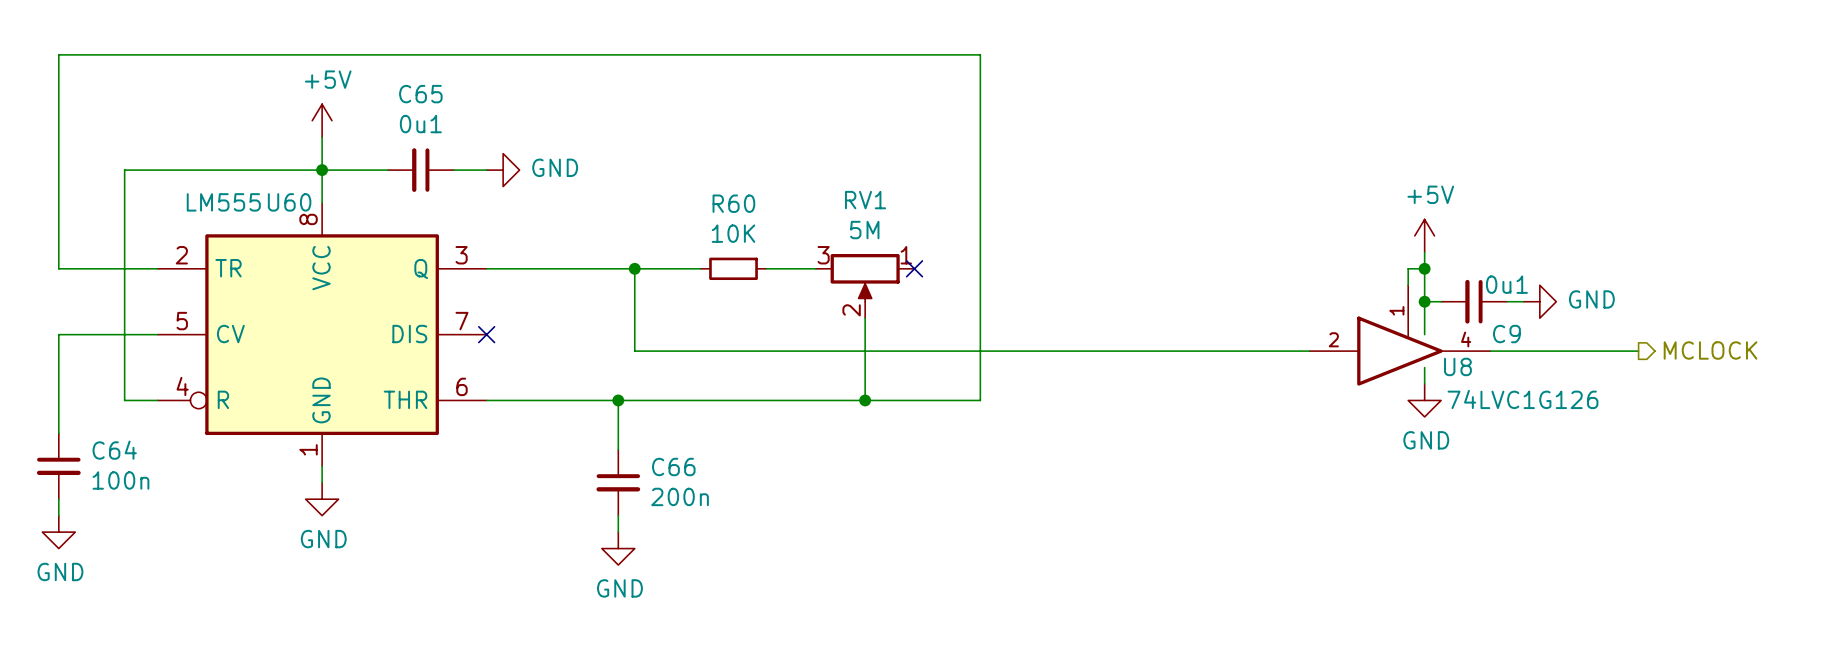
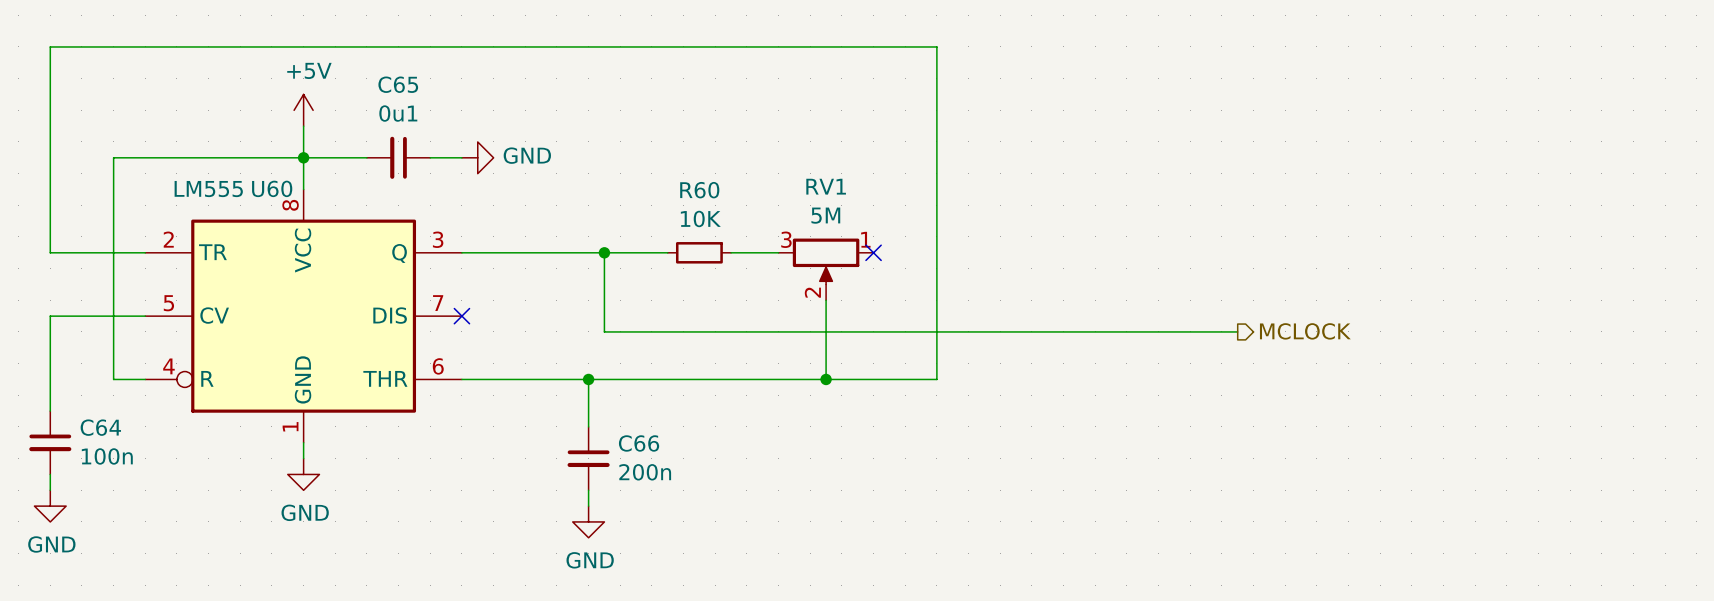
power symbol: +5V (1424, 235) -> none
wire: (1424, 252) (1424, 334) -> none
wire: (1424, 268) (1408, 268) (1408, 285) -> none
junction: (1424, 268) -> none
wire: (1424, 301) (1441, 301) -> none
junction: (1424, 301) -> none
C9: 0u1 (1474, 301) -> none
wire: (1506, 301) (1523, 301) -> none
power symbol: GND (1539, 301) -> none
U8: 74LVC1G126 (1399, 335) -> none
hierarchical label: none -> MCLOCK (1305, 331)
hierarchical label: MCLOCK (1710, 350) -> none
wire: (1293, 351) (1309, 351) -> none
wire: (1490, 351) (1638, 351) -> none
wire: (1424, 367) (1424, 384) -> none
power symbol: GND (1424, 400) -> none

